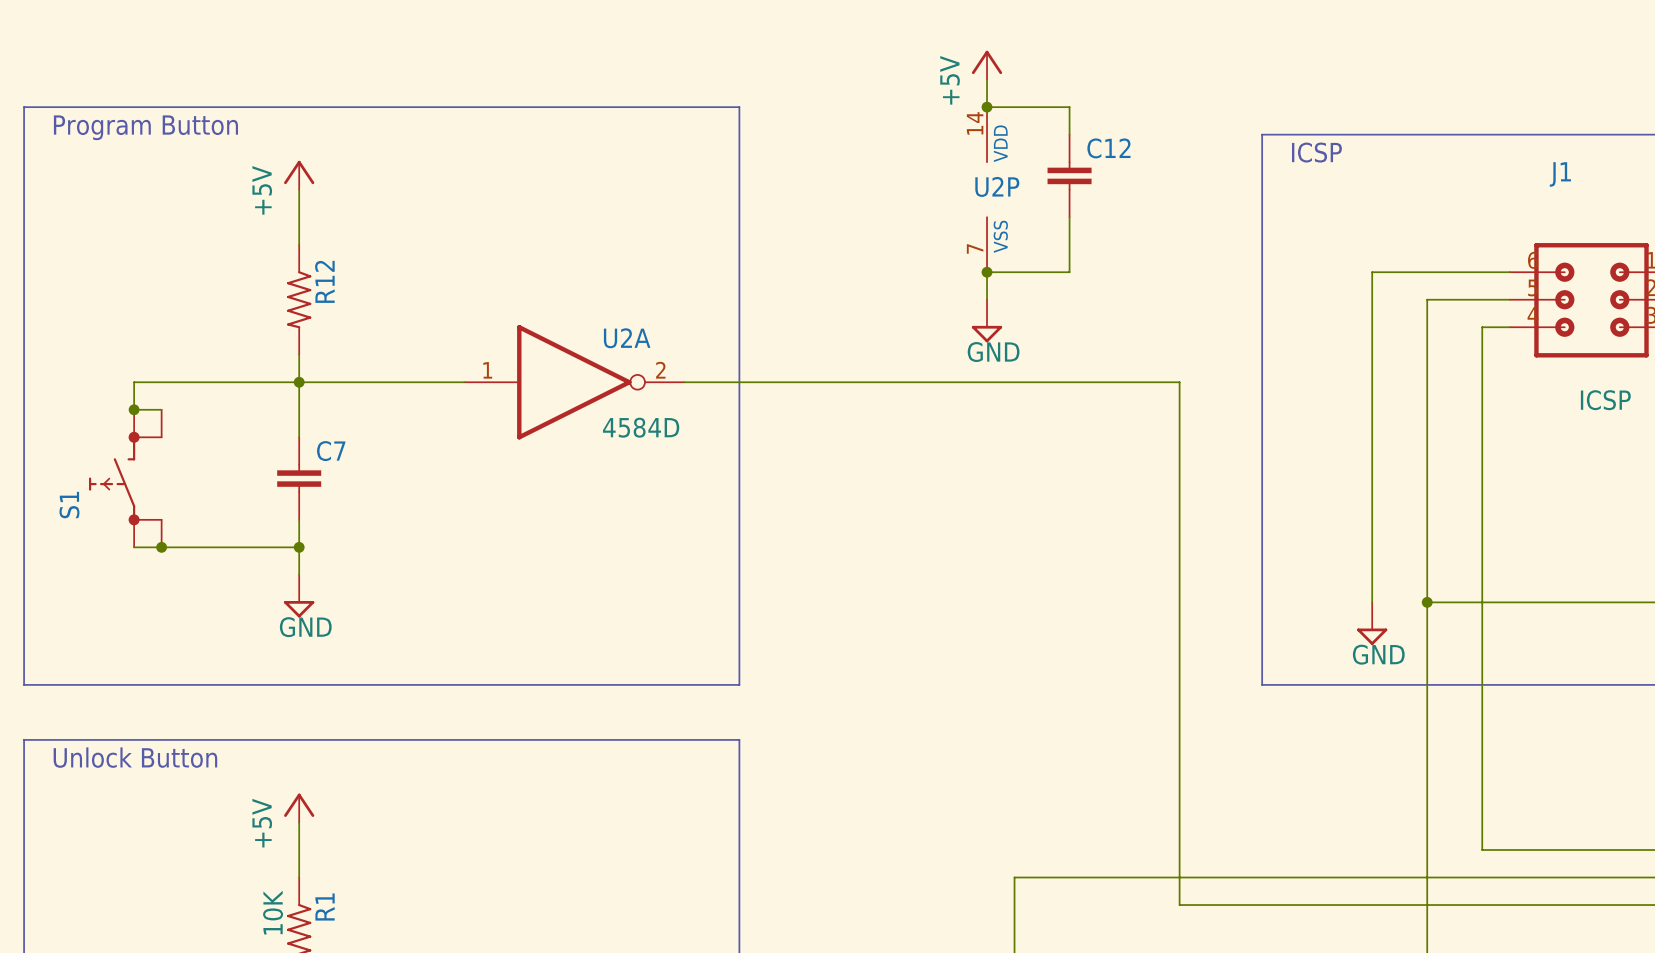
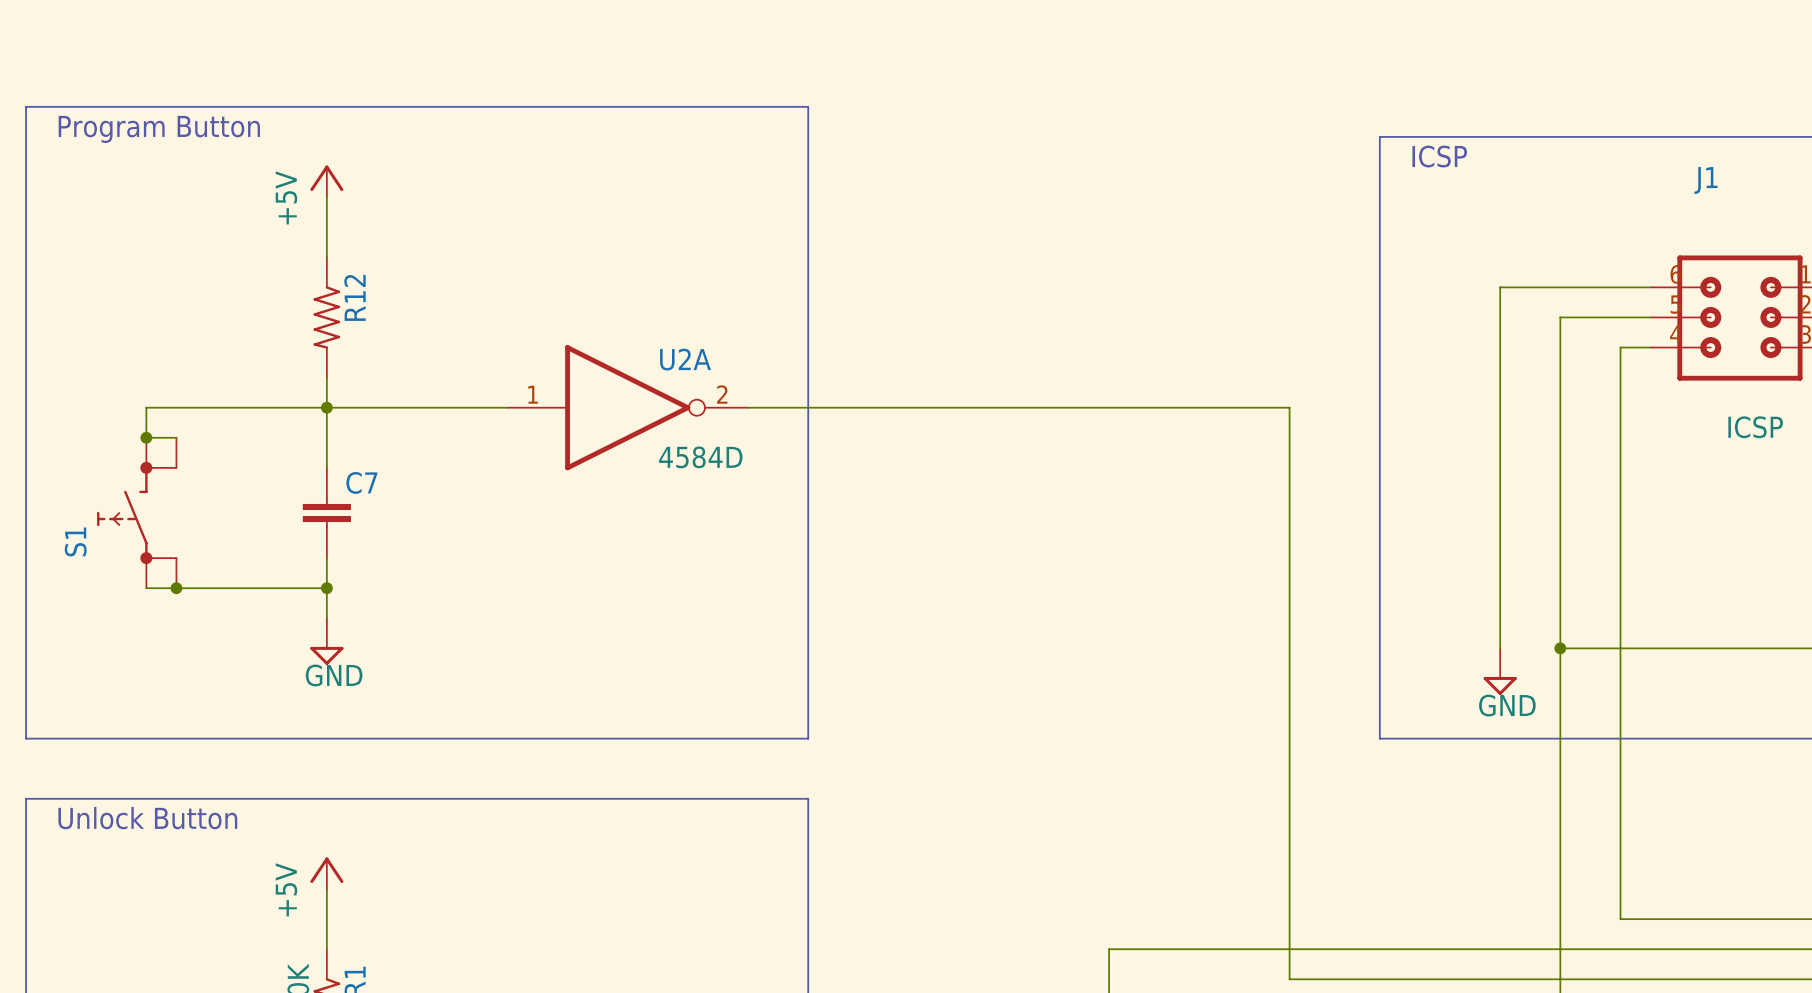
power symbol: +5V (987, 65) -> none
wire: (987, 79) (987, 107) (1069, 107) (1069, 134) -> none
junction: (987, 107) -> none
C12: (1069, 175) -> none
U2P: (987, 189) -> none
wire: (1069, 217) (1069, 272) (987, 272) (987, 299) -> none
junction: (987, 272) -> none
power symbol: GND (987, 321) -> none

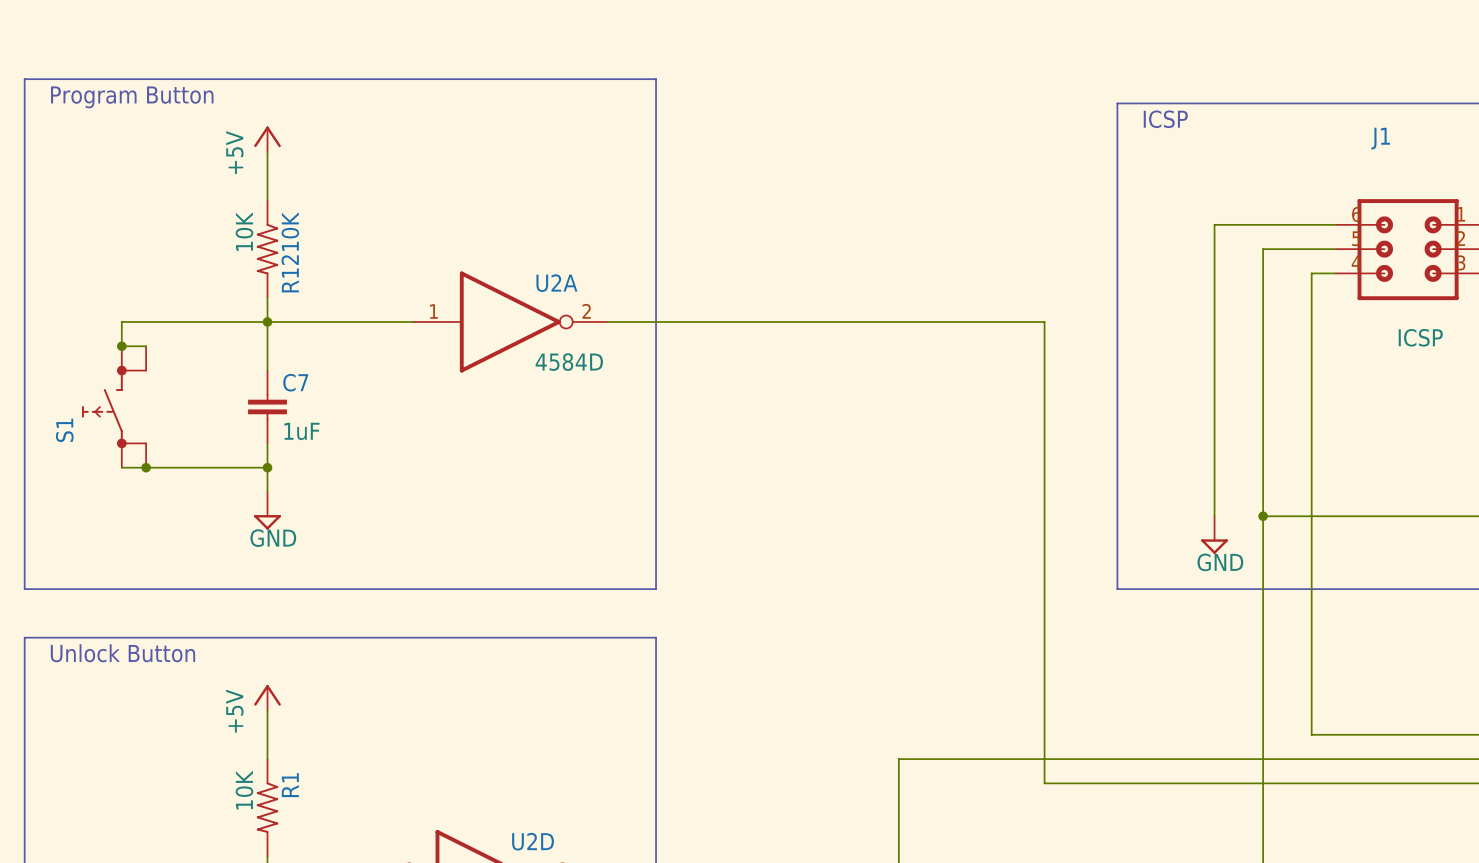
R12 value: none -> 10K (244, 231)
R12 name: R12 (354, 297) -> R1210K (290, 252)
C7 value: none -> 1uF (301, 431)

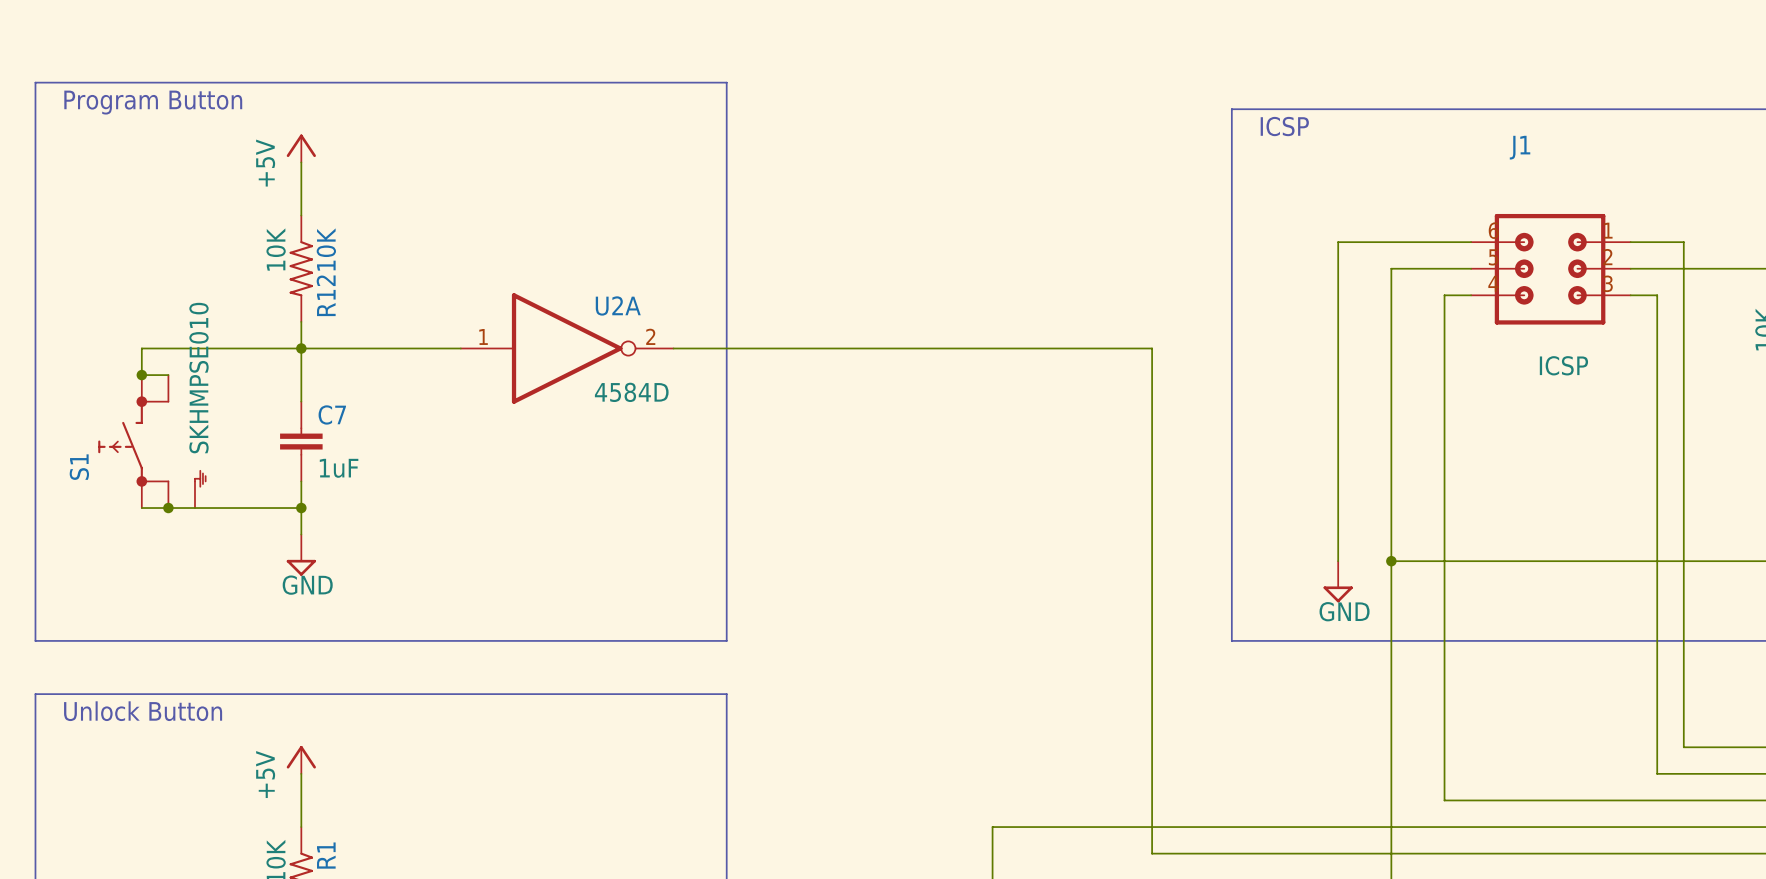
S1 symbol: [81, 346, 147, 468] -> [98, 375, 207, 509]
S1 value: none -> SKHMPSE010 (198, 378)

